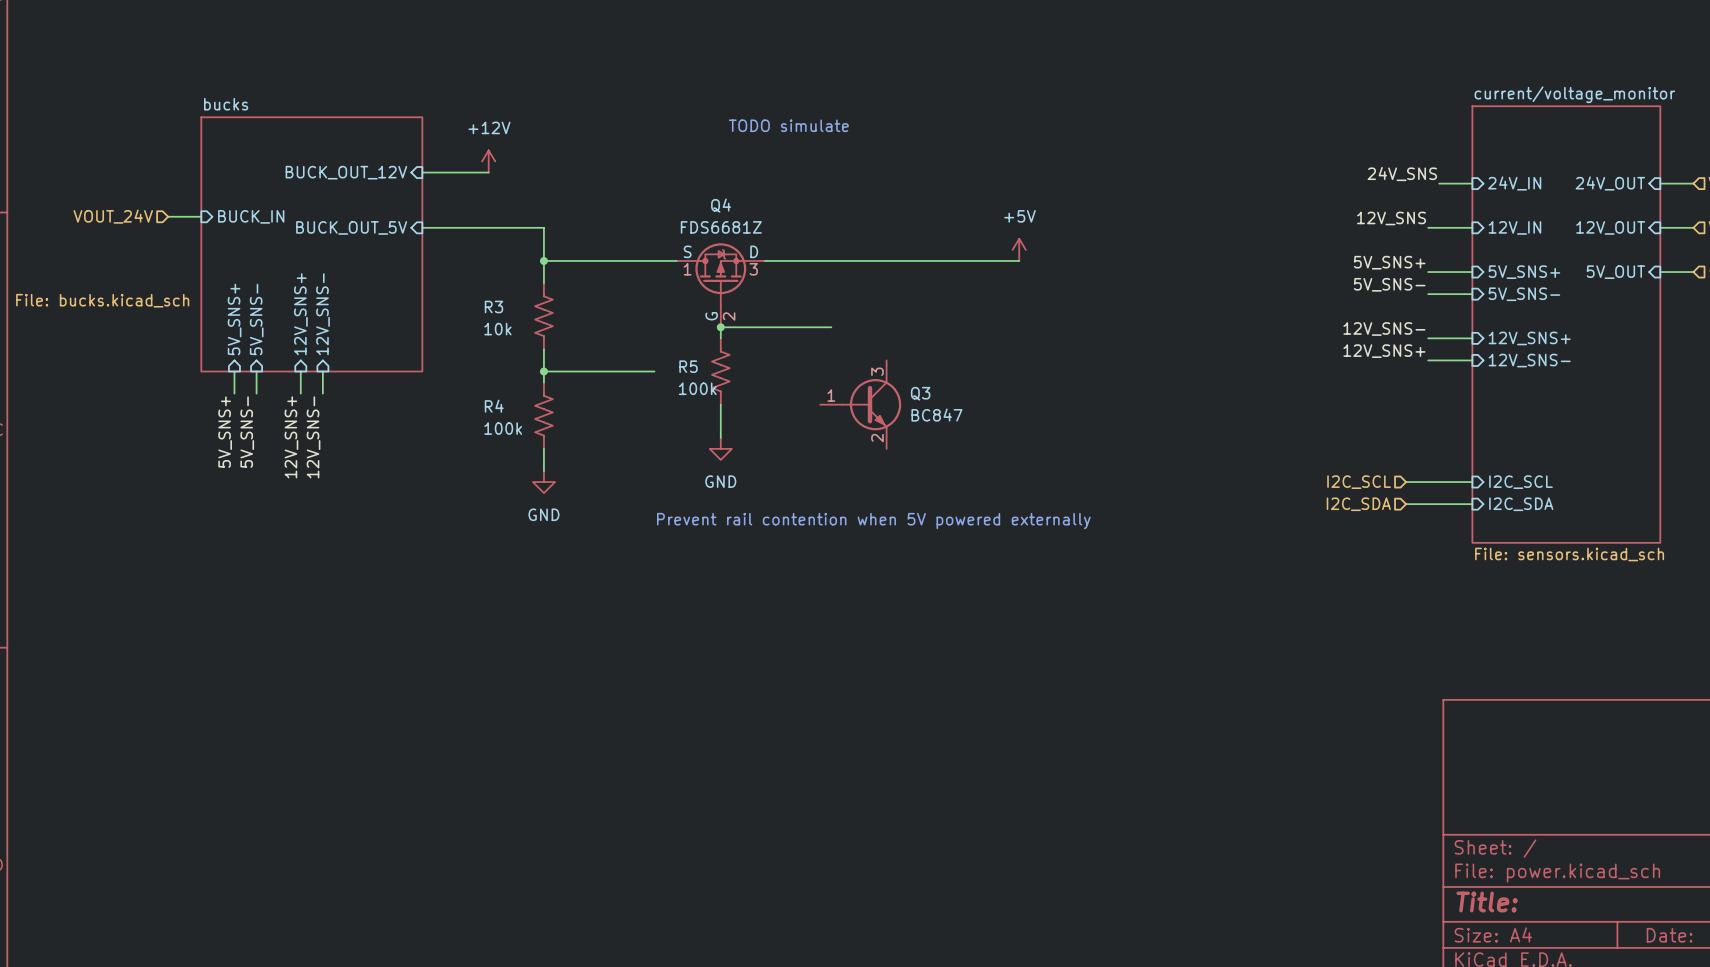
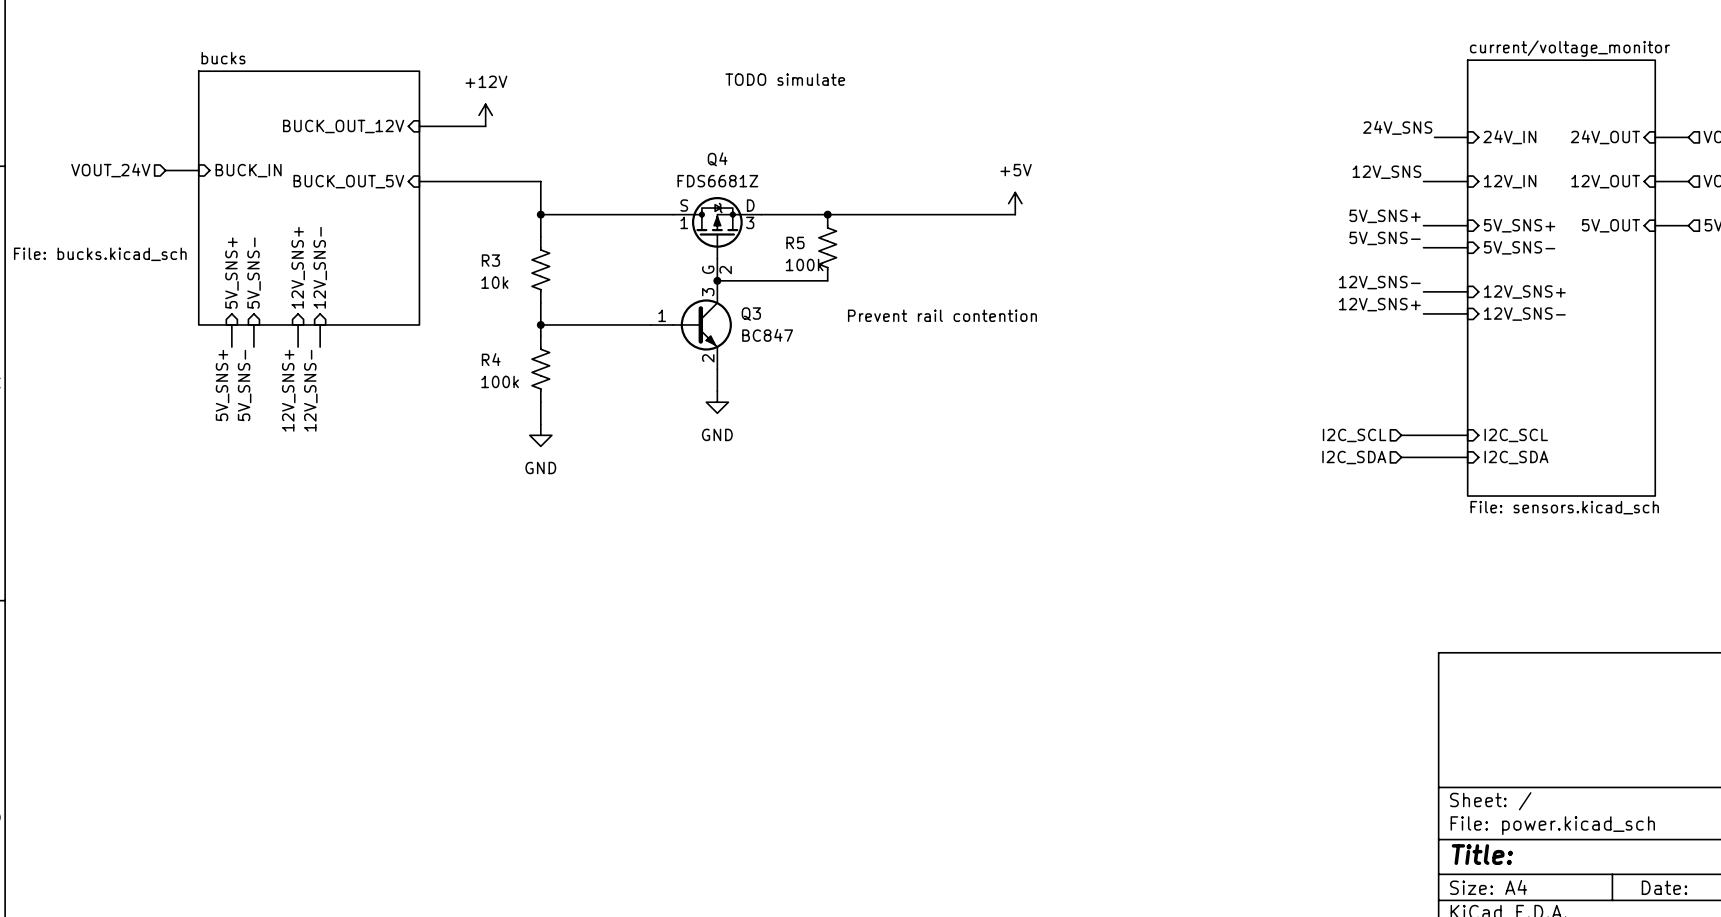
junction: none -> (827, 214)
text: none -> Prevent rail contention (942, 315)
R5 position: (720, 371) -> (827, 247)
Q3 position: (860, 404) -> (691, 324)
text: Prevent rail contention when 5V powered externally (873, 521) -> none

